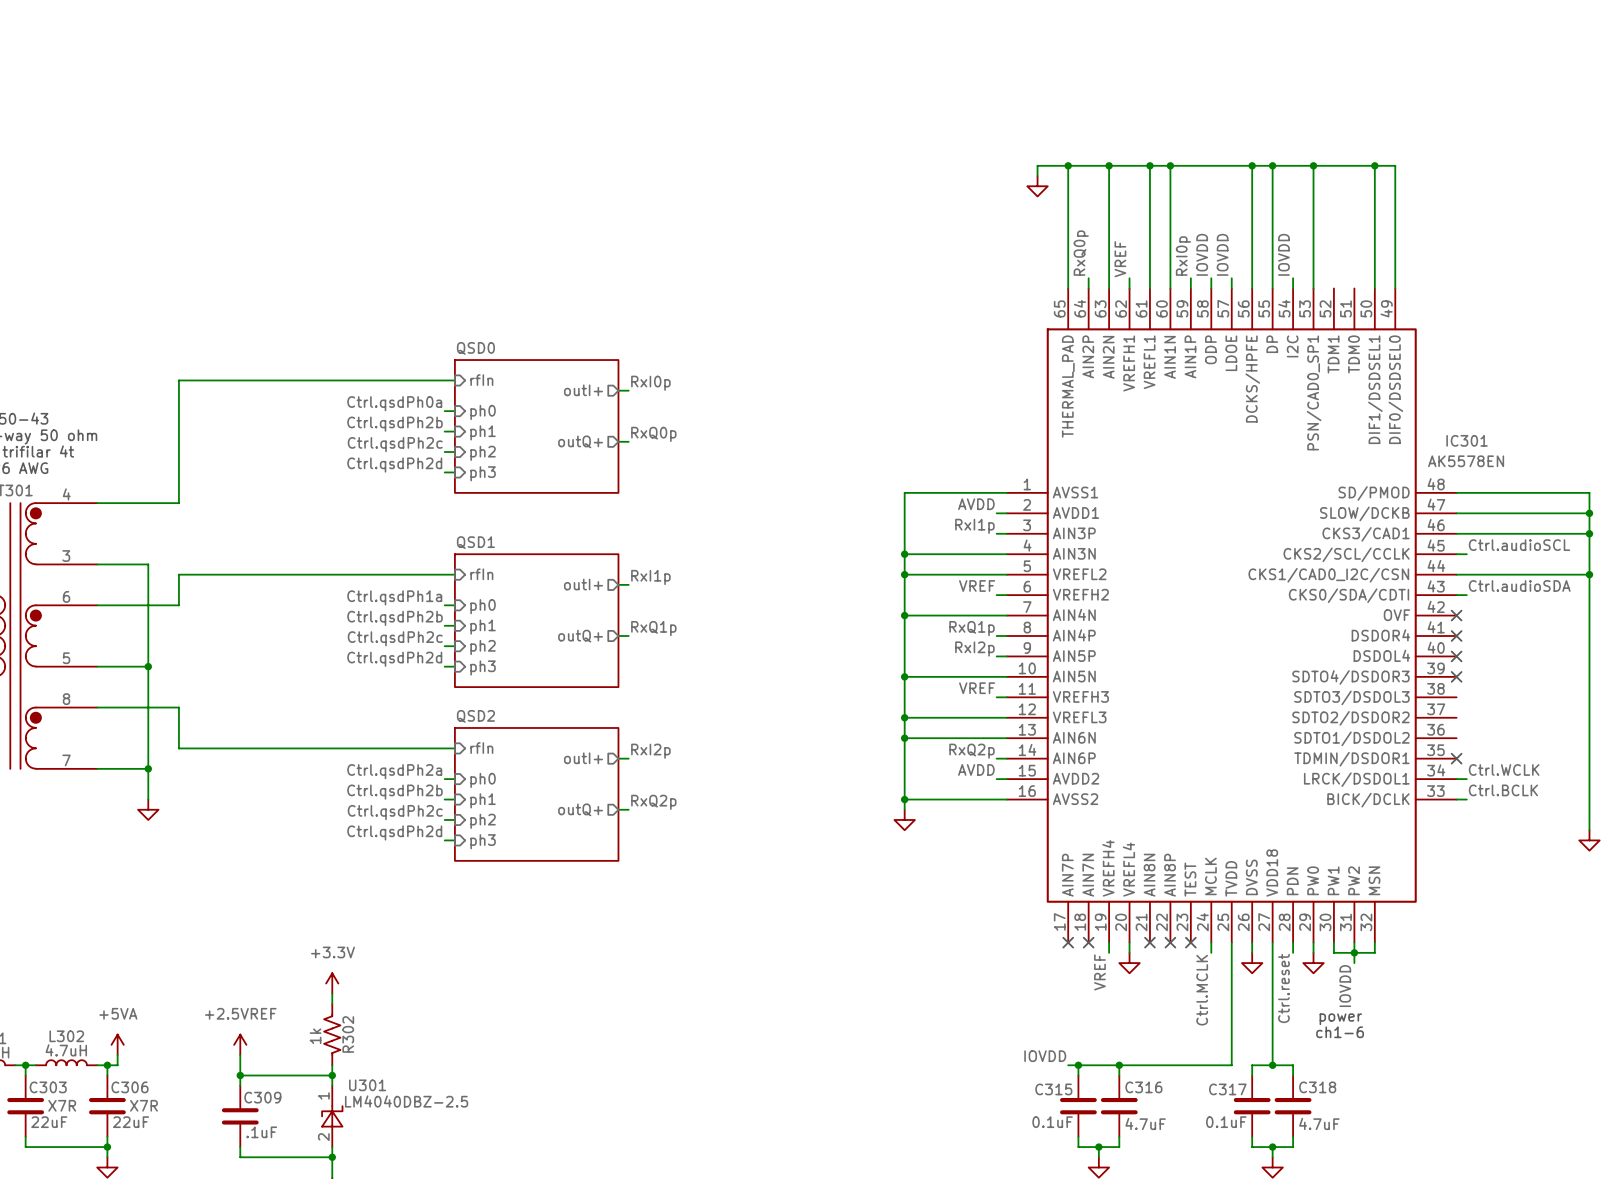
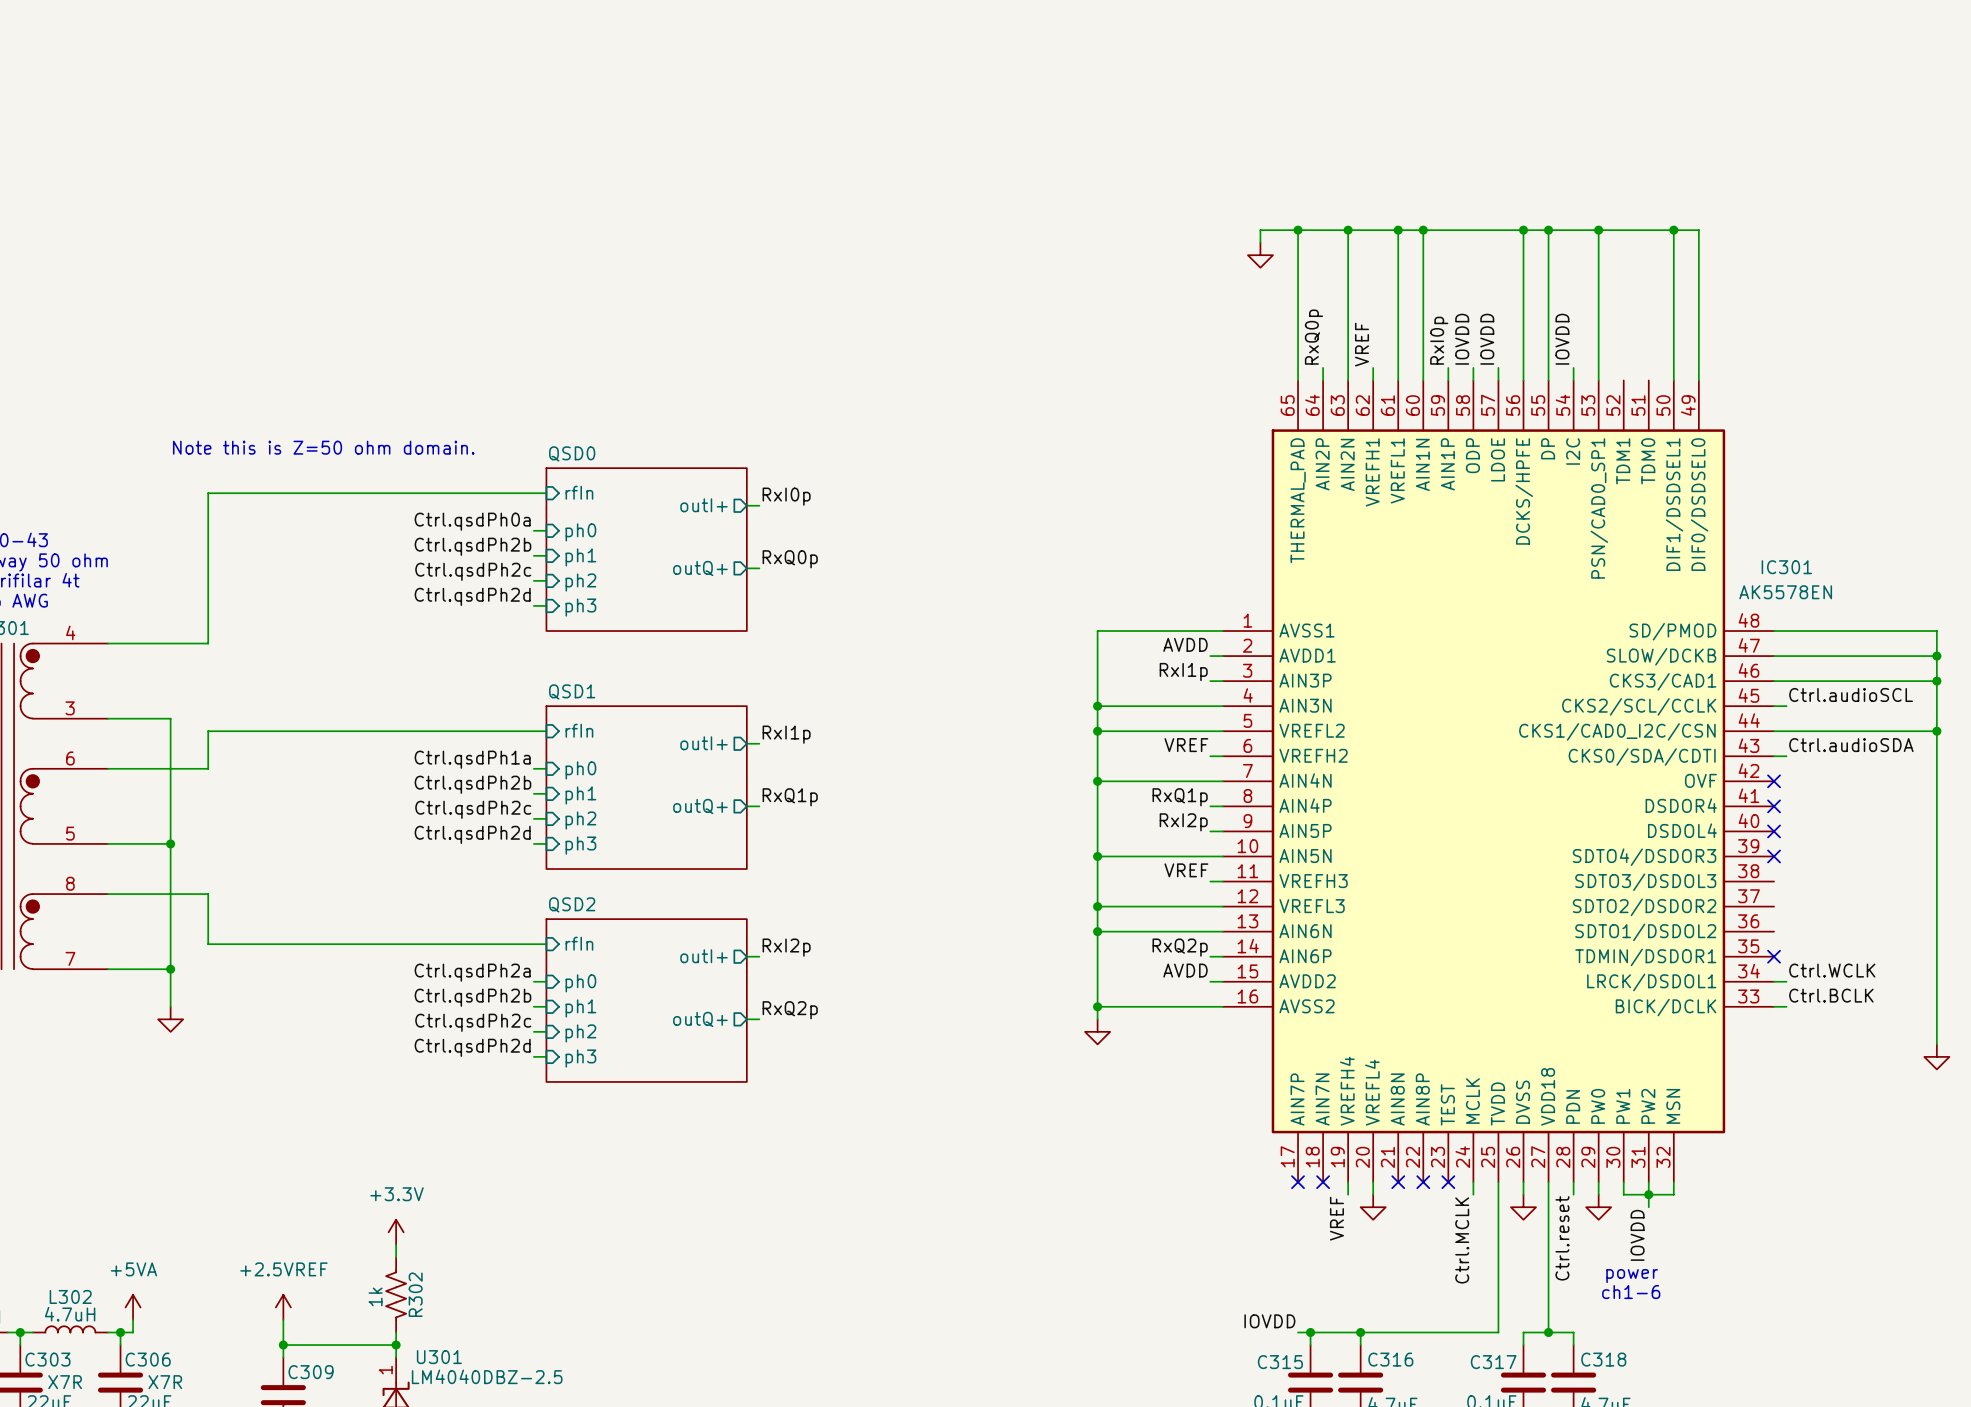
text: none -> Note this is Z=50 ohm domain. (323, 447)

